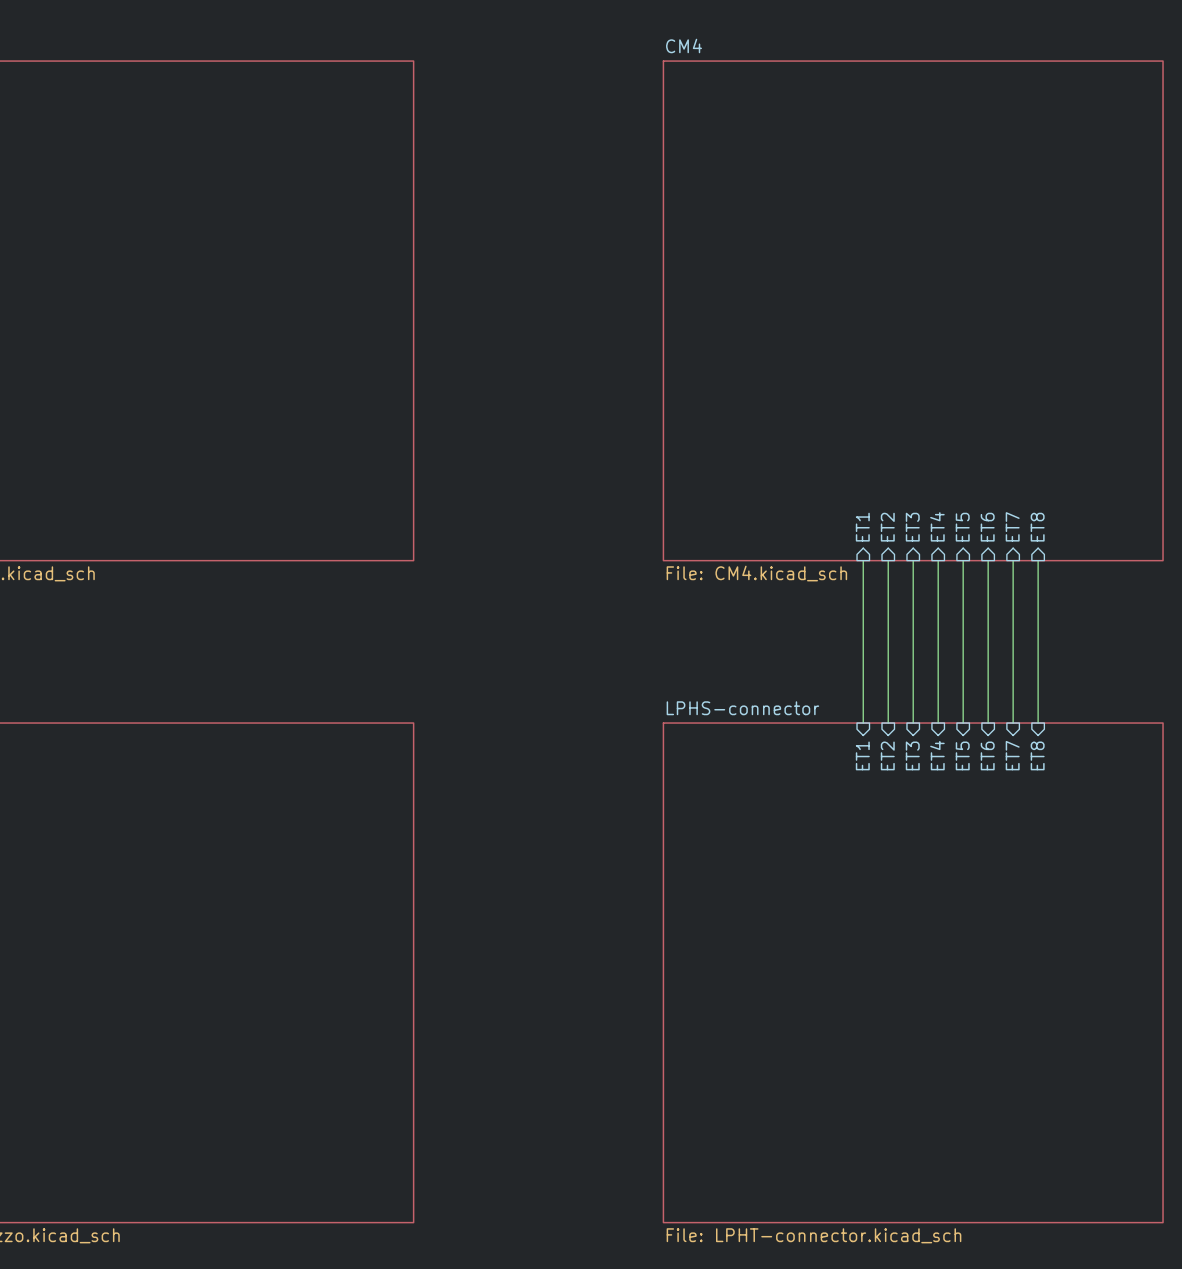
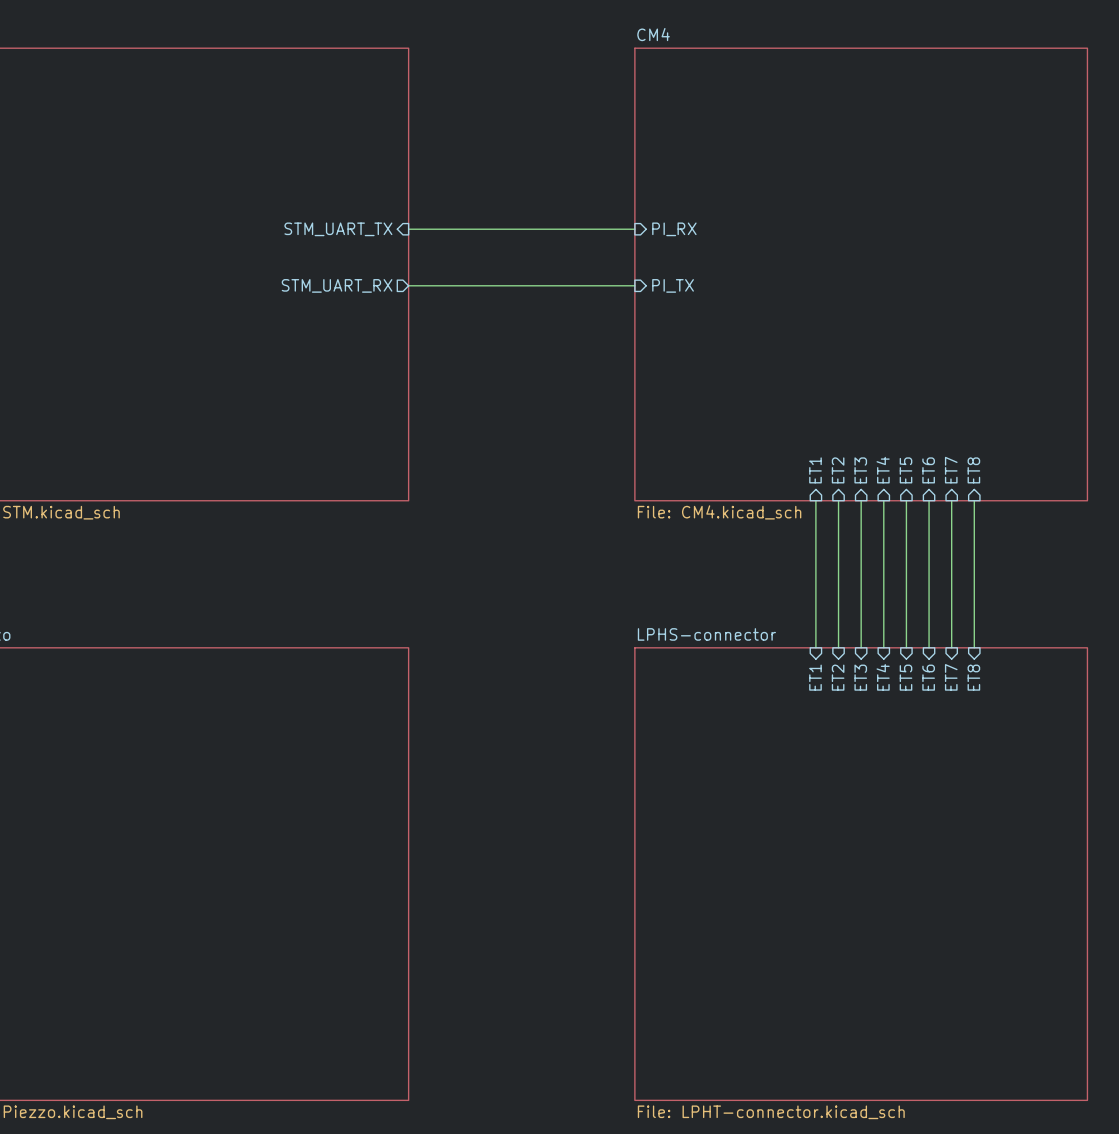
wire: none -> (408, 229) (634, 229)
sheet pin: none -> STM_UART_TX (338, 229)
sheet pin: none -> PI_RX (674, 229)
sheet pin: none -> STM_UART_RX (337, 285)
wire: none -> (408, 285) (634, 285)
sheet pin: none -> PI_TX (673, 285)

